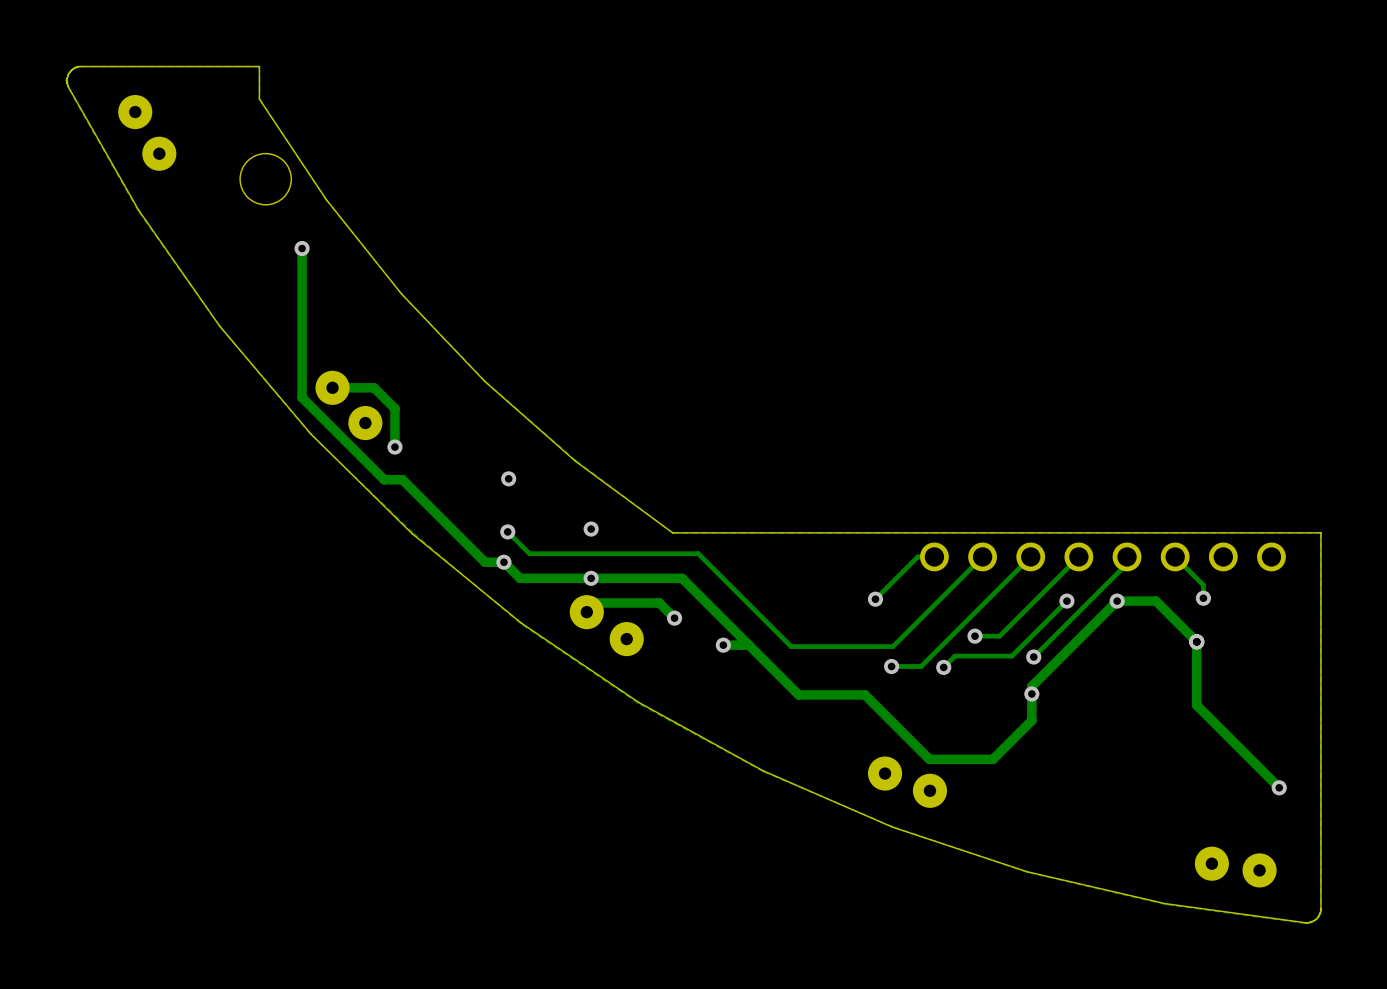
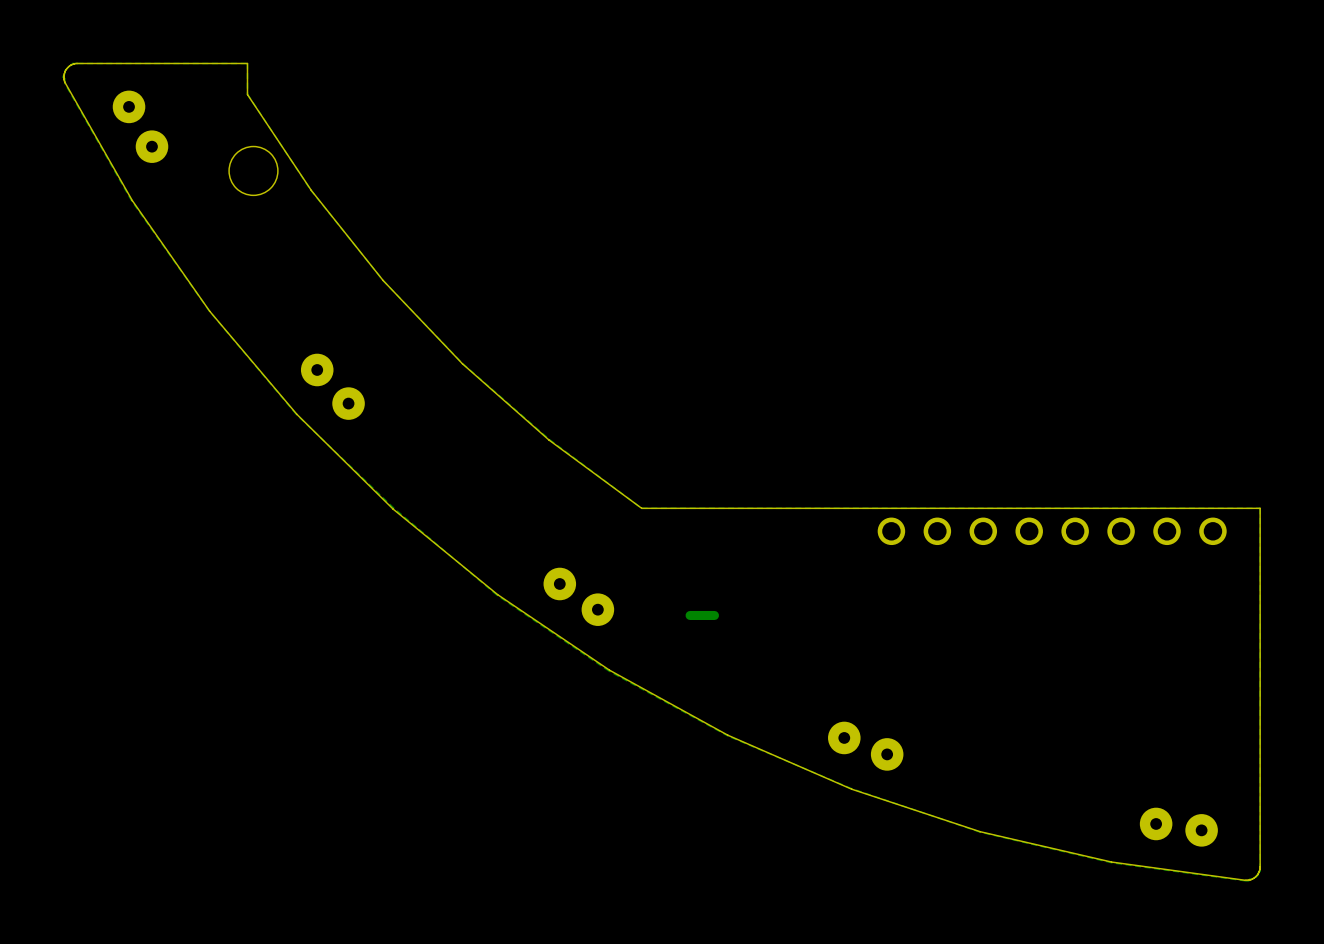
track: (302, 248) (302, 397) (384, 479) (402, 479) (484, 562) (503, 562) (520, 578) (682, 578) (798, 694) (865, 694) (929, 759) (993, 759) (1031, 720) (1031, 686) (1117, 601) (1156, 601) (1196, 641) (1196, 705) (1279, 787) -> none
via: (302, 248) -> none
track: (332, 387) (374, 387) (394, 408) (394, 447) -> none
via: (394, 447) -> none
via: (508, 478) -> none
via: (591, 529) -> none
track: (507, 531) (529, 553) (698, 553) (791, 646) (892, 646) (982, 556) -> none
via: (507, 531) -> none
track: (934, 556) (917, 556) (875, 599) -> none
track: (1030, 556) (921, 666) (891, 666) -> none
track: (1078, 556) (999, 636) (974, 636) -> none
track: (1127, 556) (1127, 563) (1033, 657) -> none
track: (1175, 556) (1203, 585) (1203, 598) -> none
via: (503, 562) -> none
via: (591, 578) -> none
via: (1203, 598) -> none
via: (875, 599) -> none
track: (1066, 601) (1011, 656) (955, 656) (943, 667) -> none
via: (1066, 601) -> none
via: (1117, 601) -> none
track: (586, 612) (595, 602) (659, 602) (674, 618) -> none
via: (674, 618) -> none
via: (974, 636) -> none
via: (1196, 641) -> none
via: (723, 645) -> none
via: (1033, 657) -> none
via: (891, 666) -> none
via: (943, 667) -> none
via: (1031, 693) -> none
via: (1279, 787) -> none

